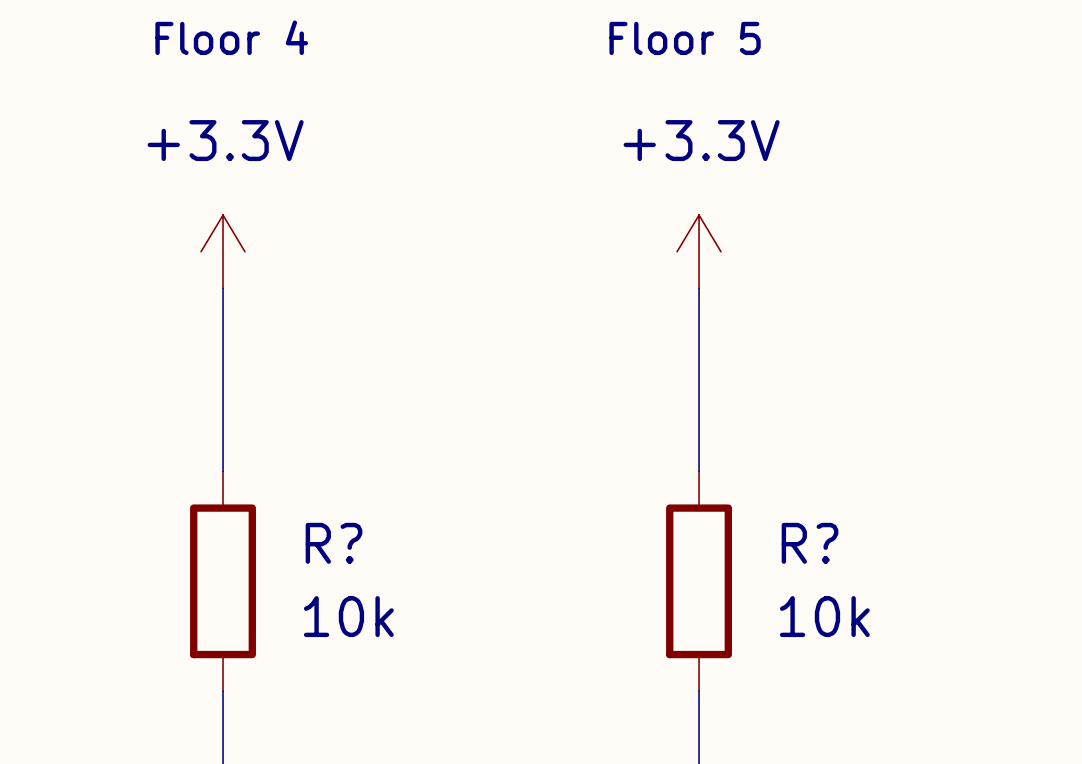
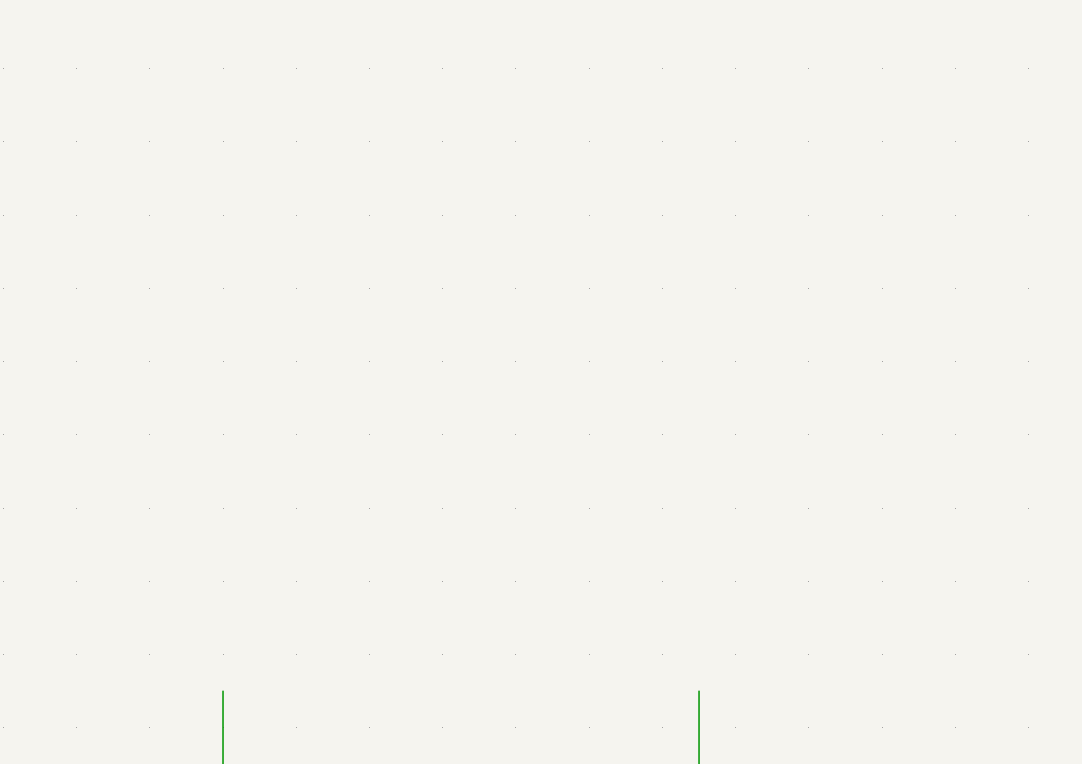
text: Floor 4 (231, 37) -> none
text: Floor 5 (685, 38) -> none
power symbol: +3.3V (223, 251) -> none
power symbol: +3.3V (699, 251) -> none
wire: (223, 288) (223, 471) -> none
wire: (699, 288) (699, 471) -> none
R?: 10k (223, 581) -> none
R?: 10k (699, 581) -> none

